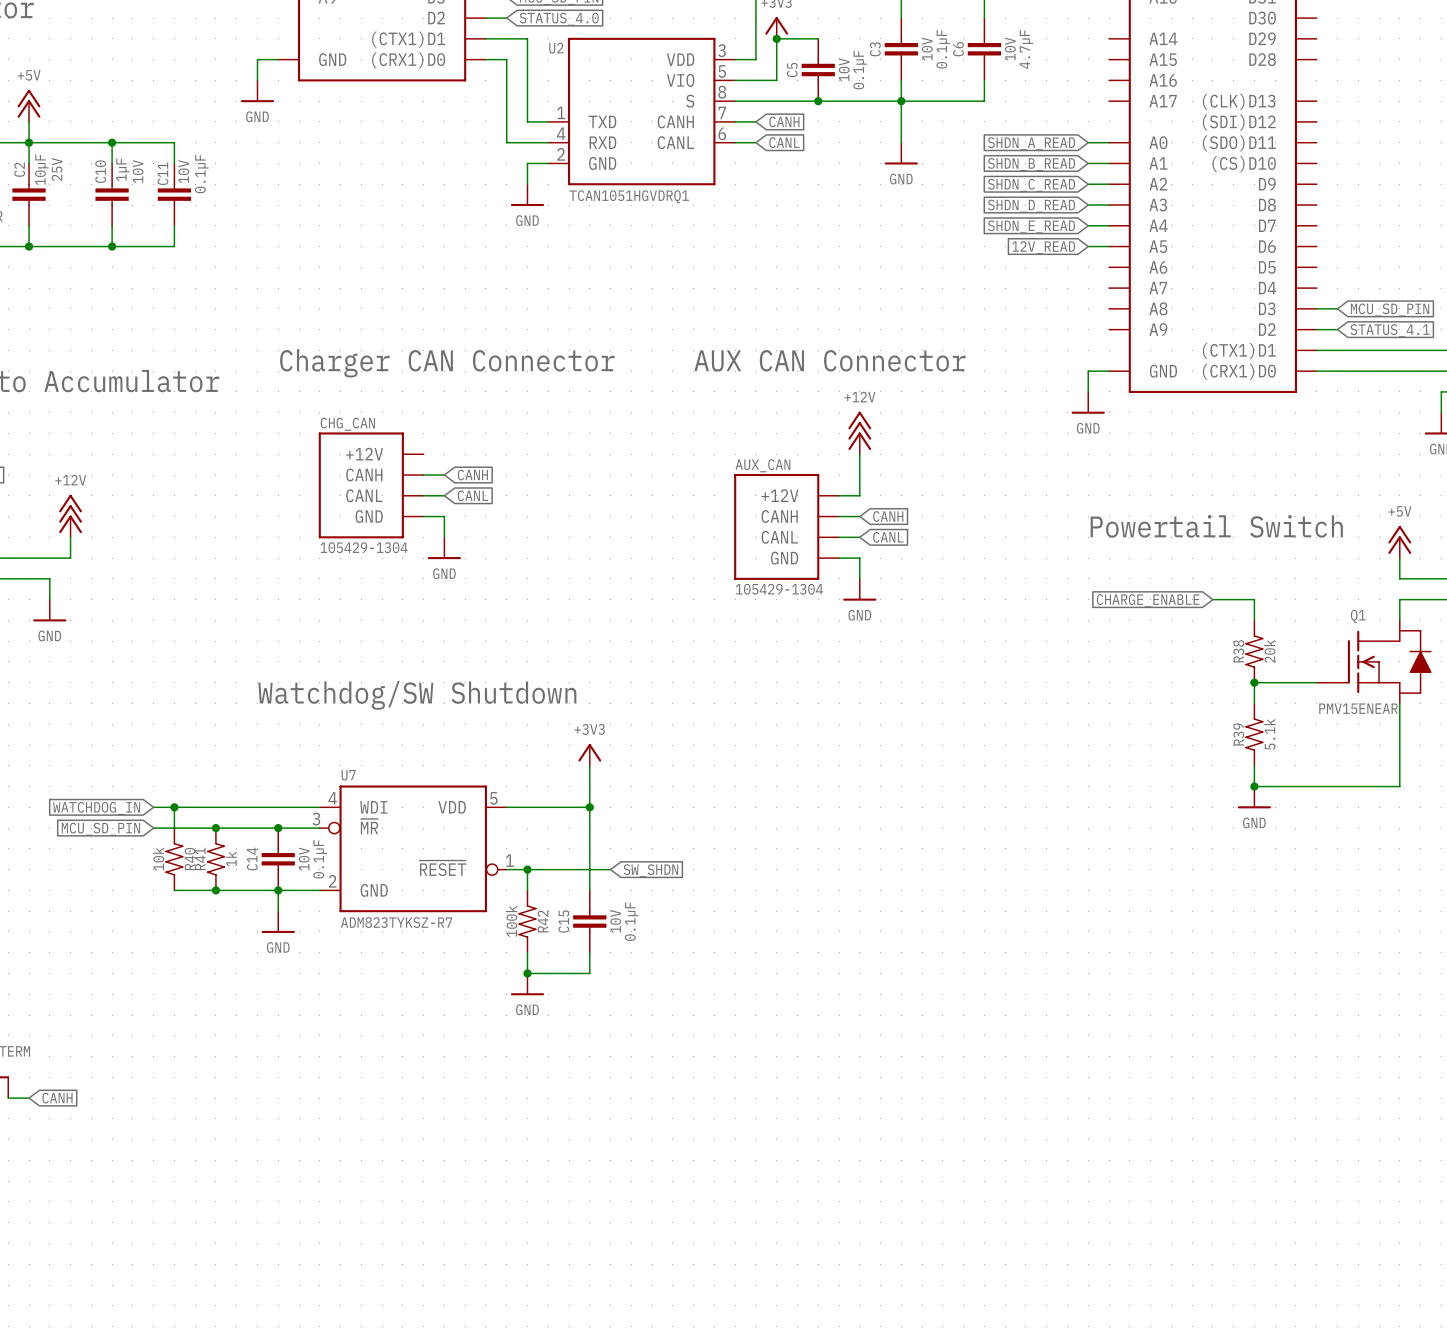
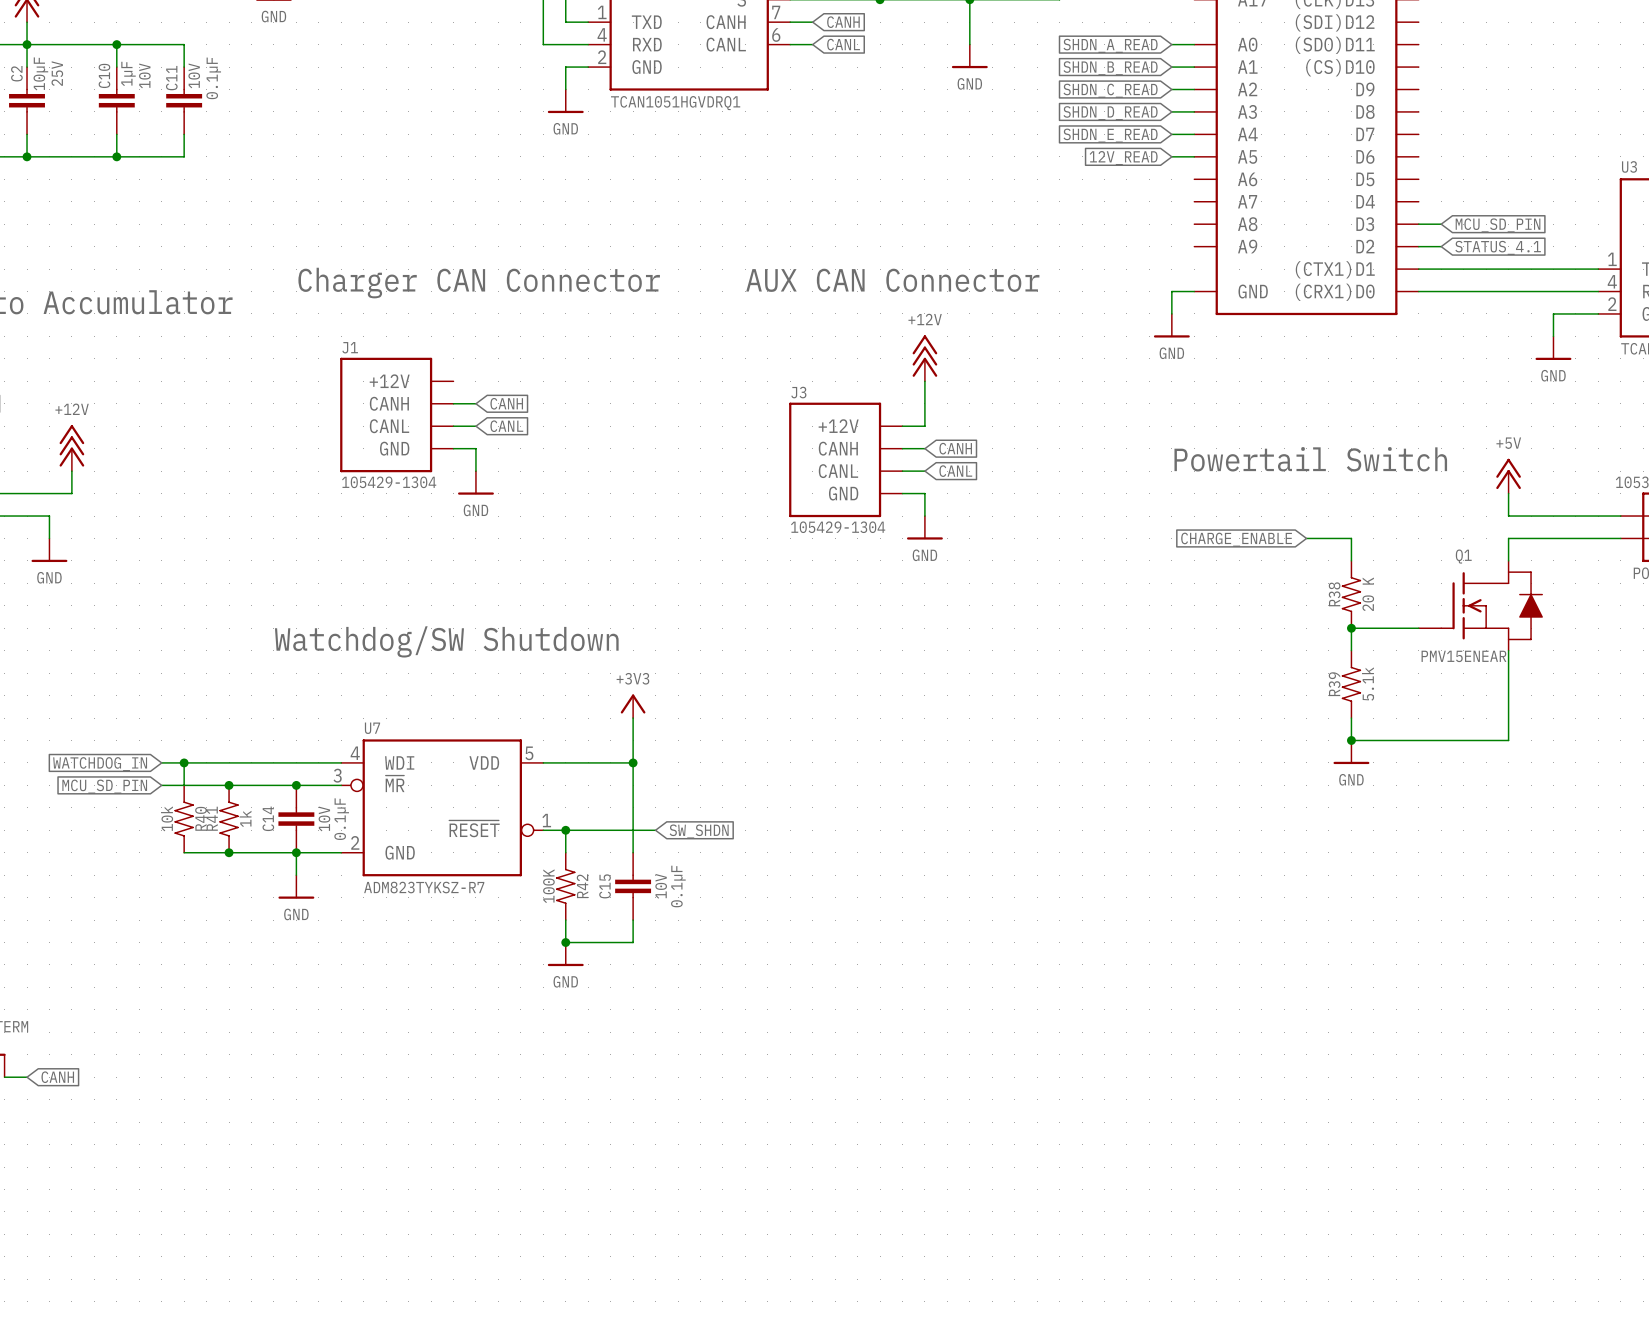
CHG_CAN name: CHG_CAN (347, 424) -> J1 (350, 347)
AUX_CAN name: AUX_CAN (762, 465) -> J3 (798, 392)
R38 text: 20k (1269, 651) -> 20 K (1368, 594)
R42 text: 100k (511, 921) -> 100K (548, 886)

